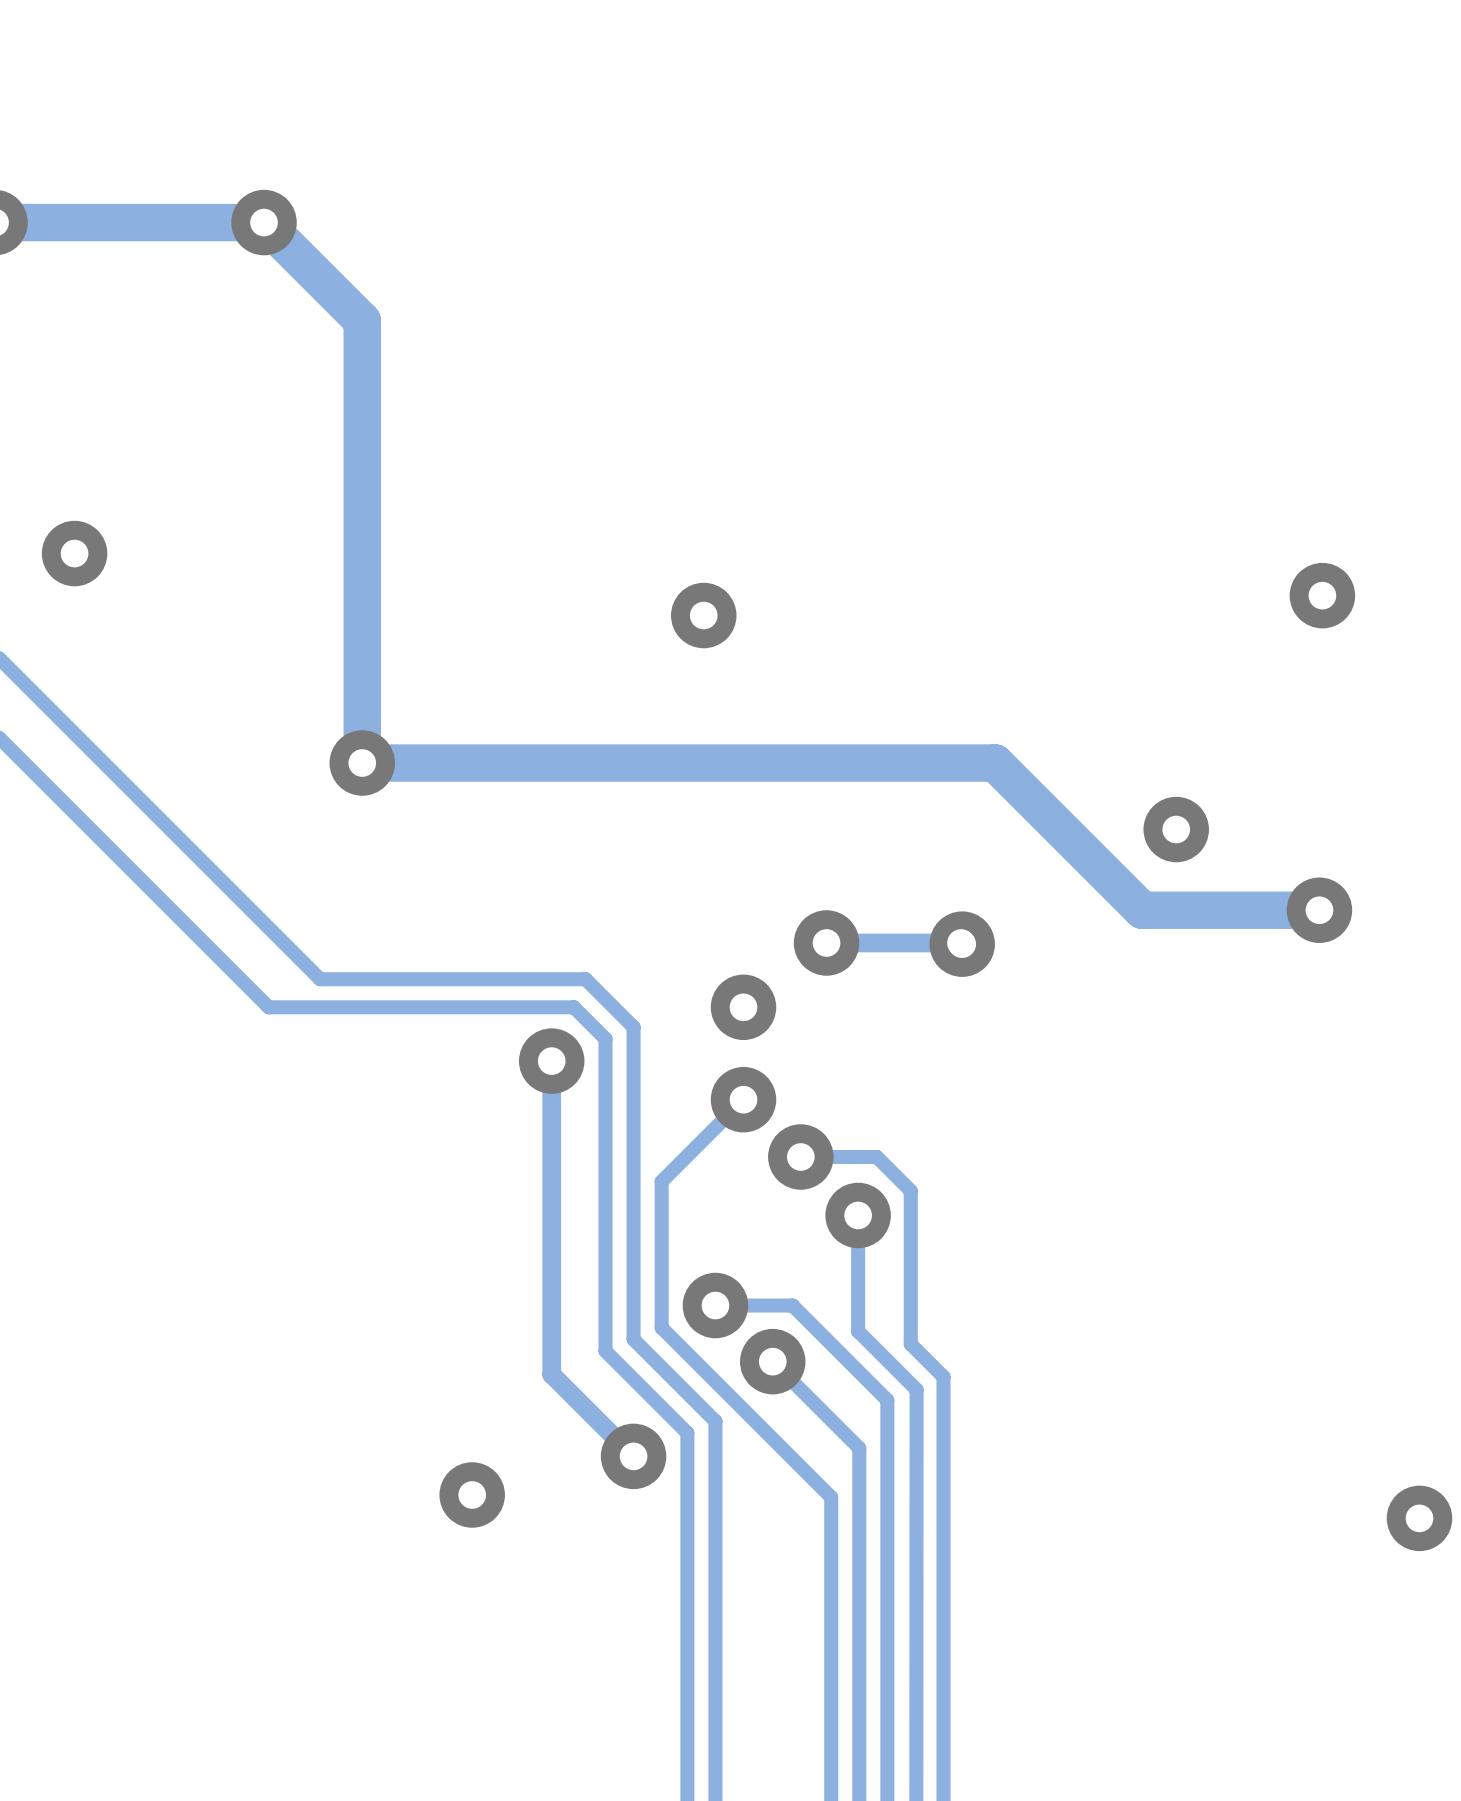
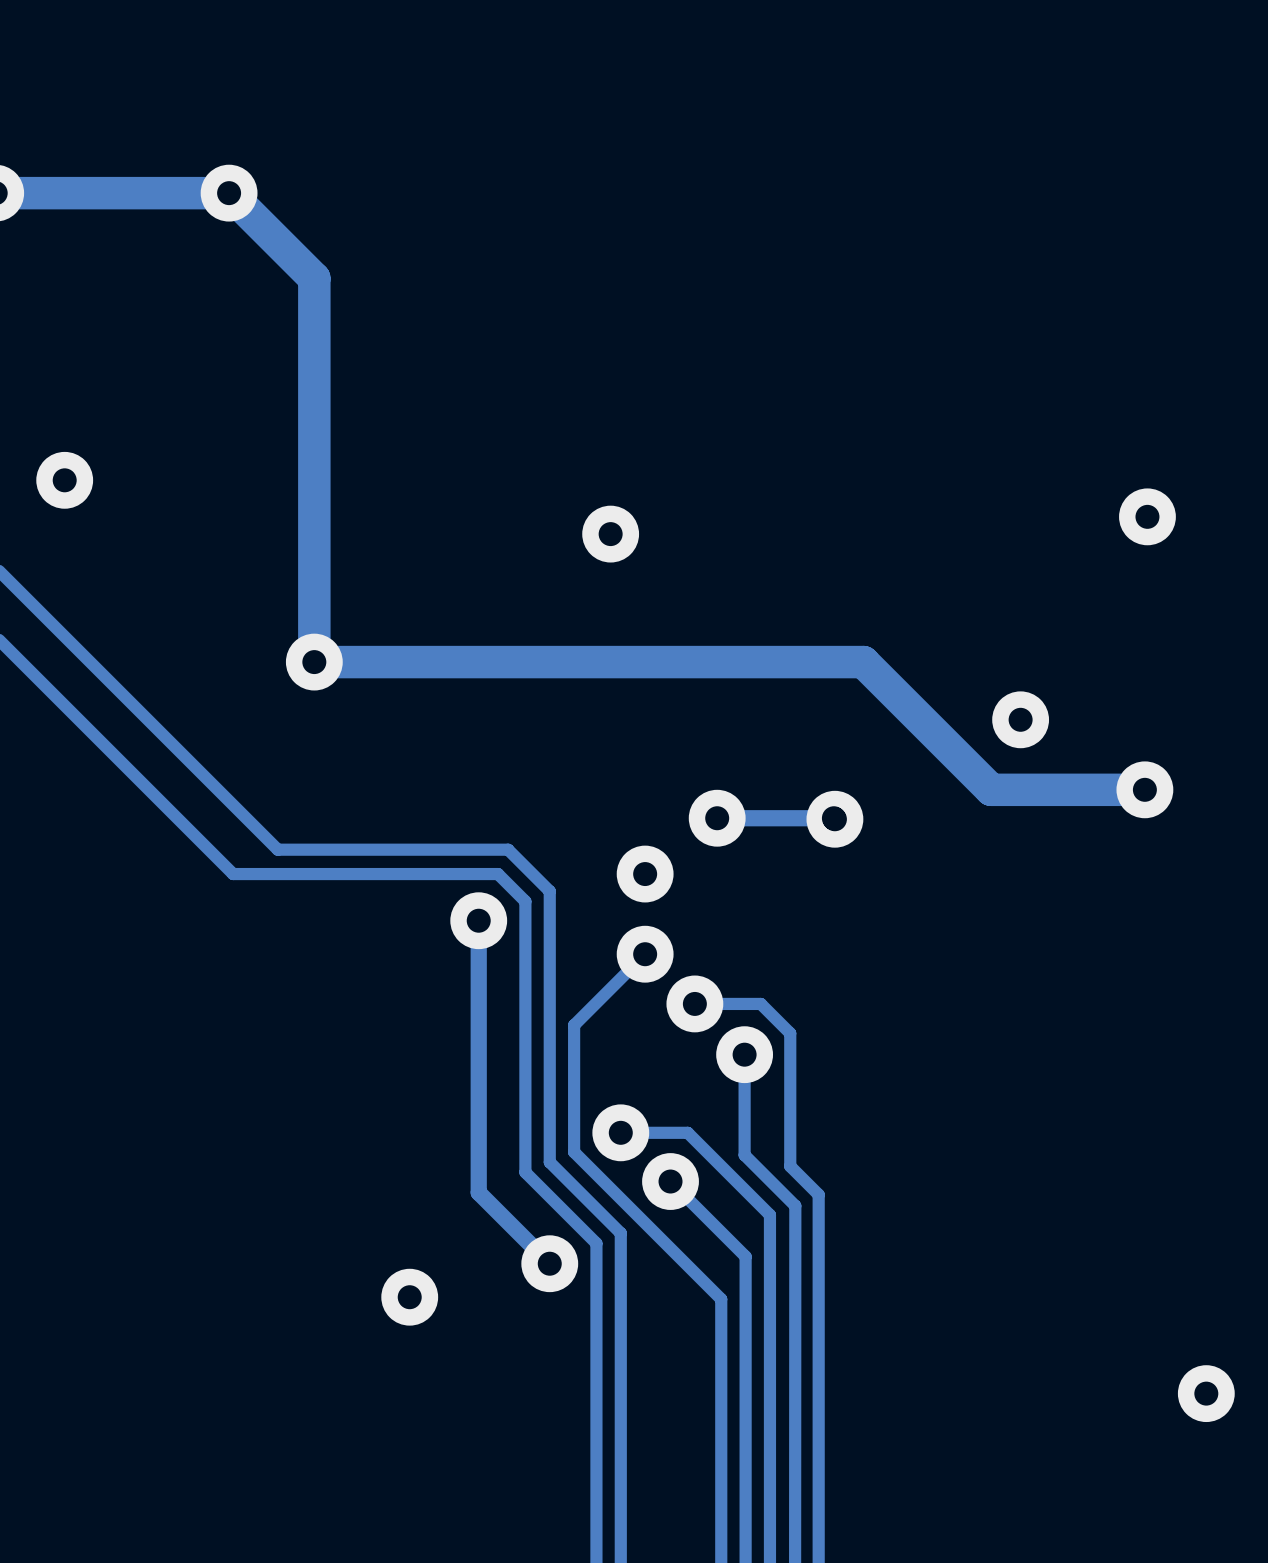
via position: (1419, 1518) -> (1206, 1393)

